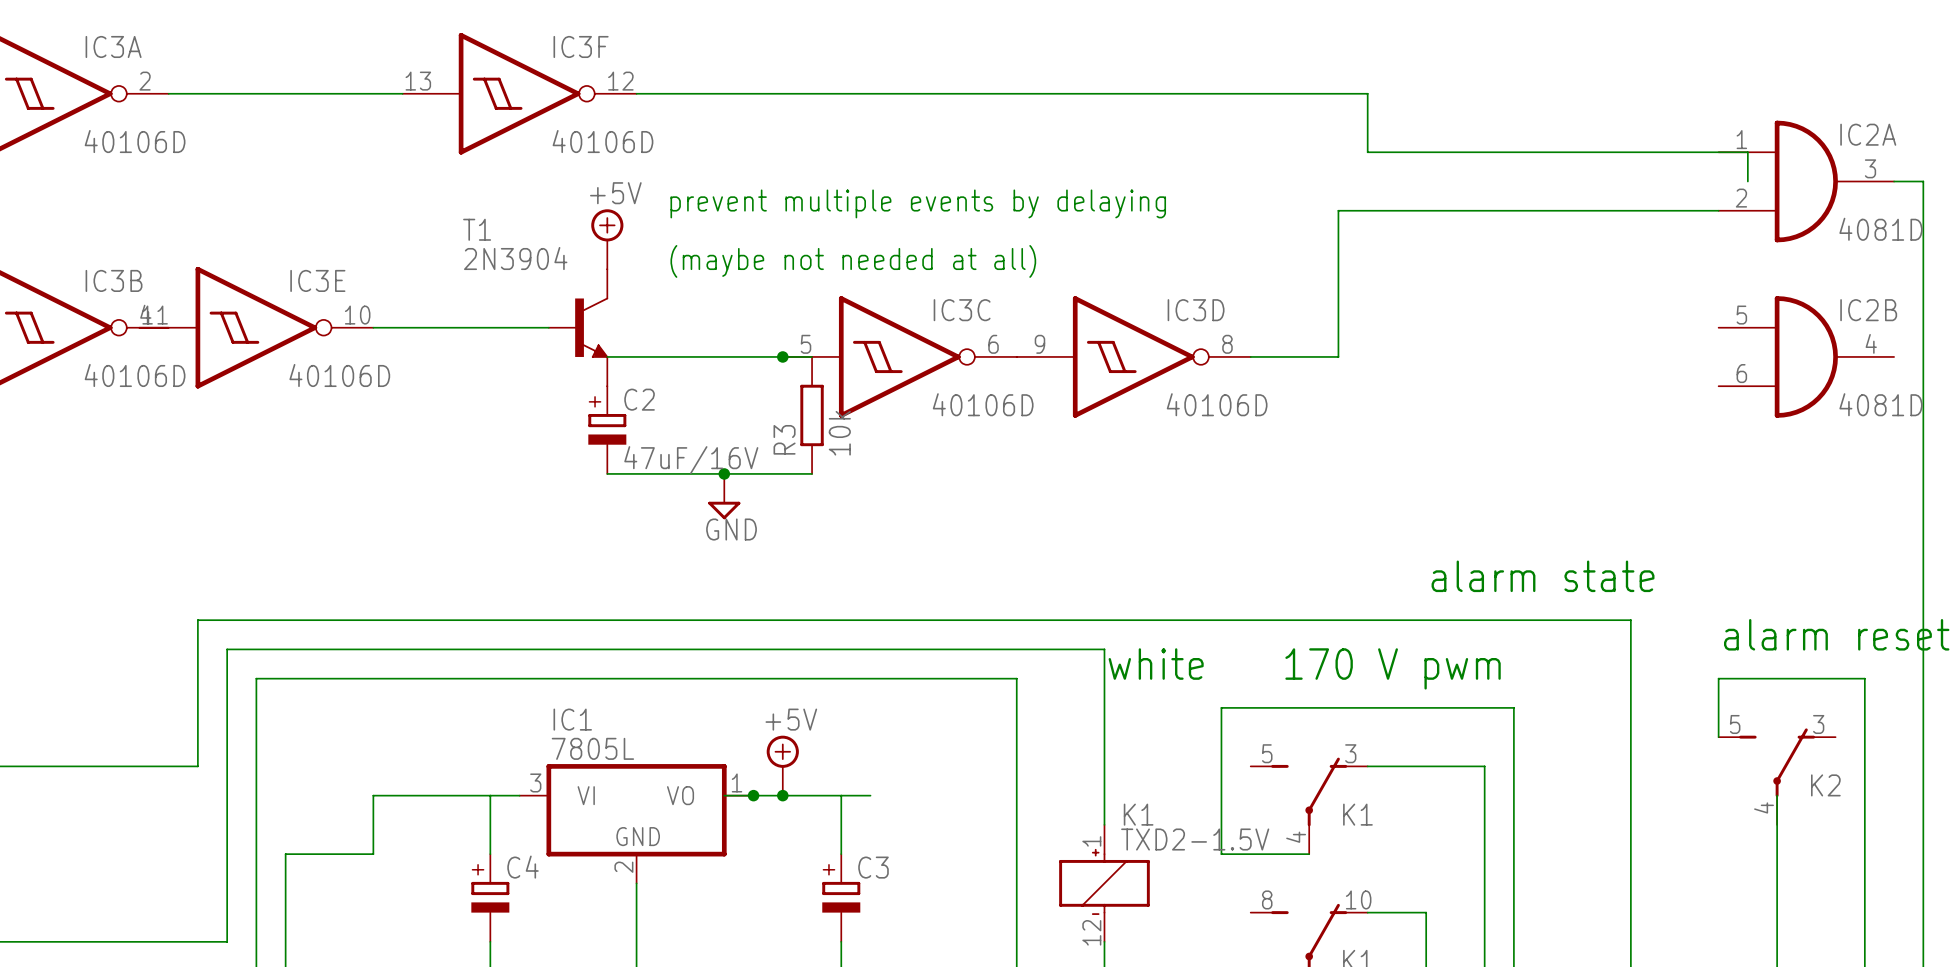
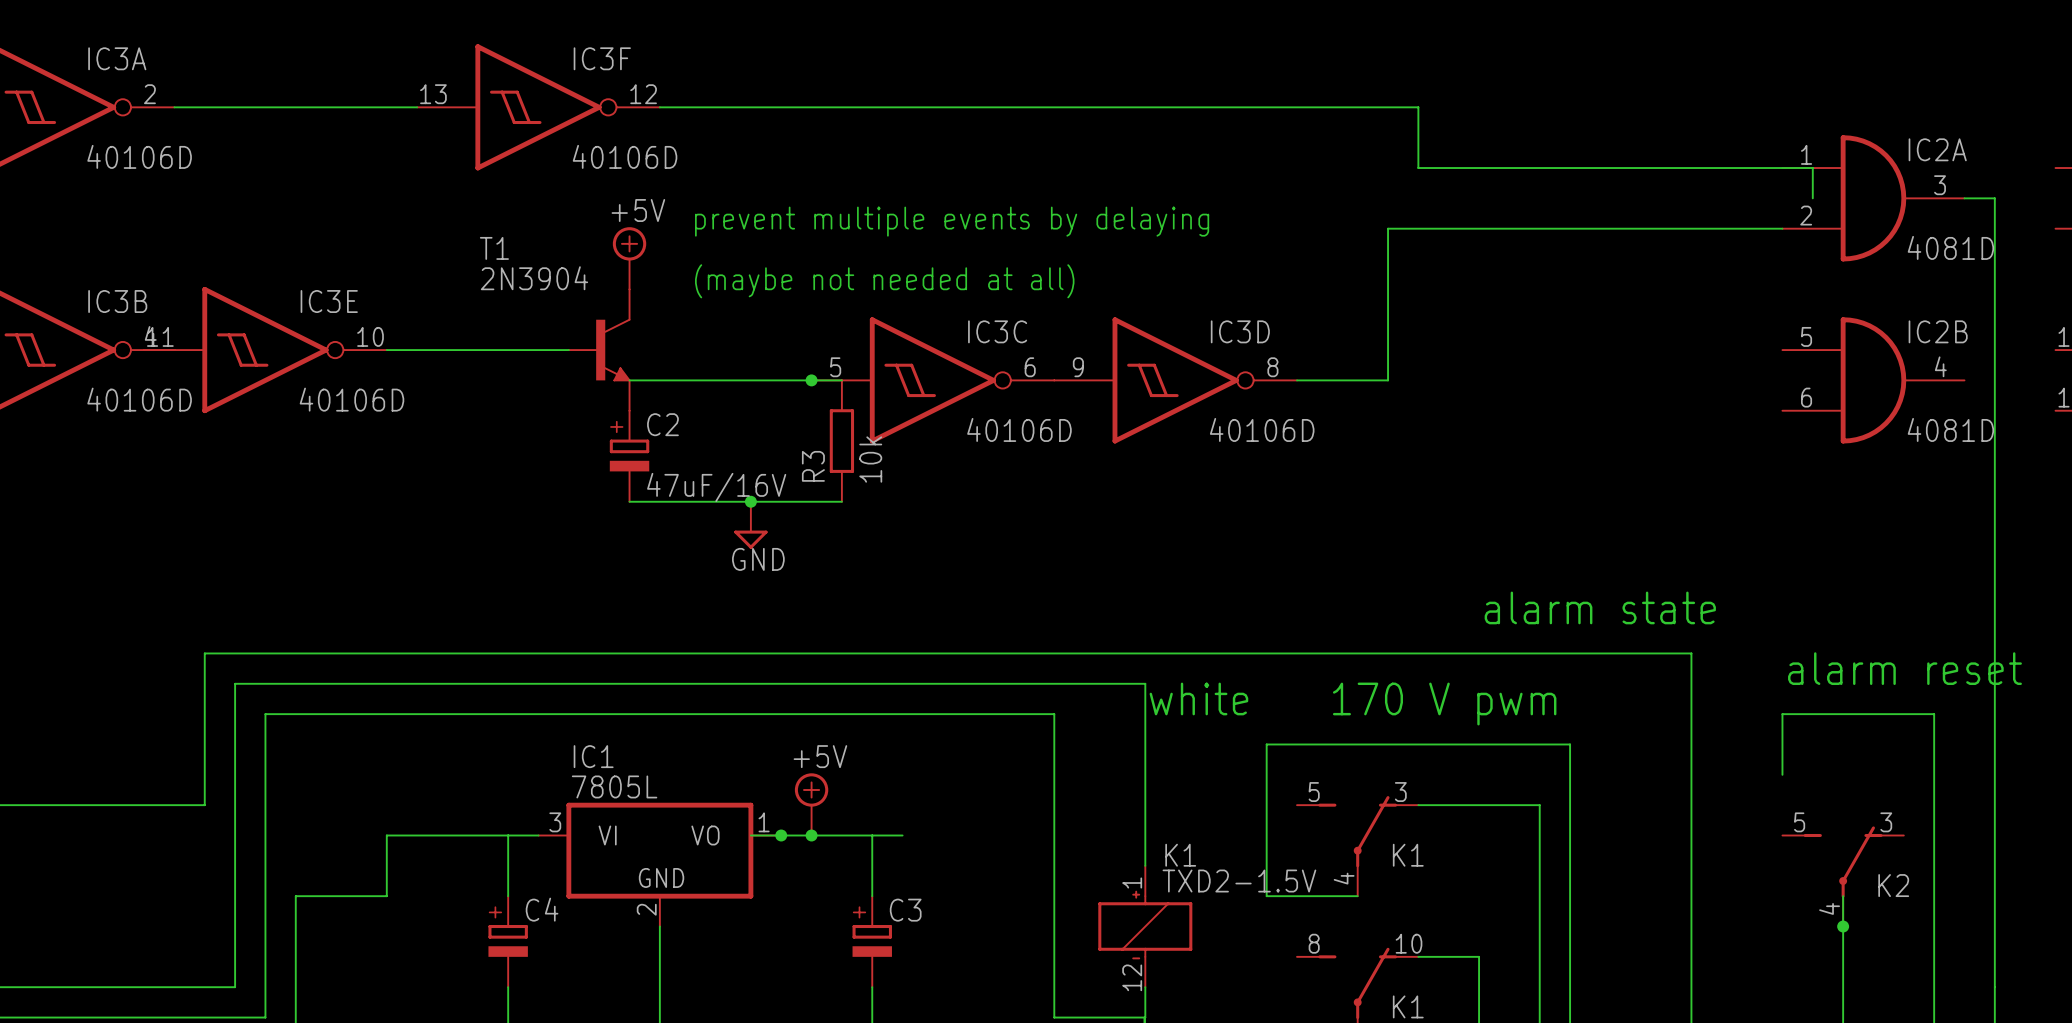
K2 position: (1777, 776) -> (1843, 876)
wire: (1777, 795) (1777, 854) -> none
junction: none -> (1843, 926)

